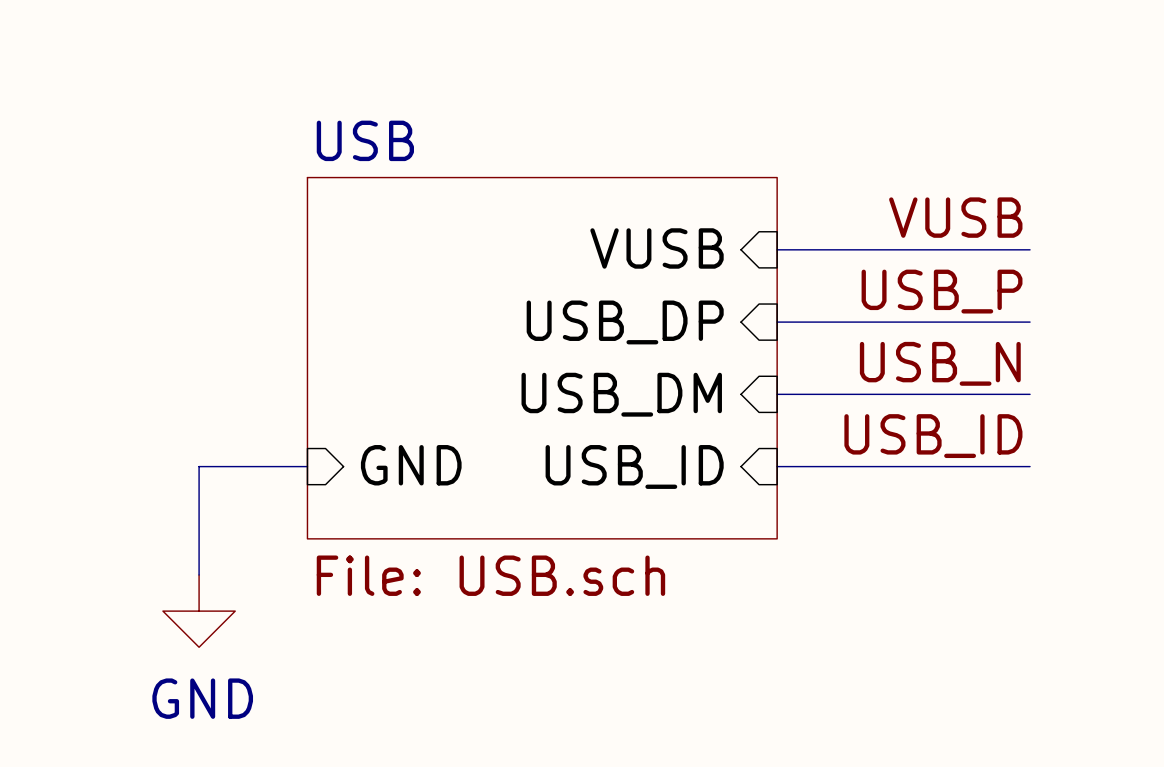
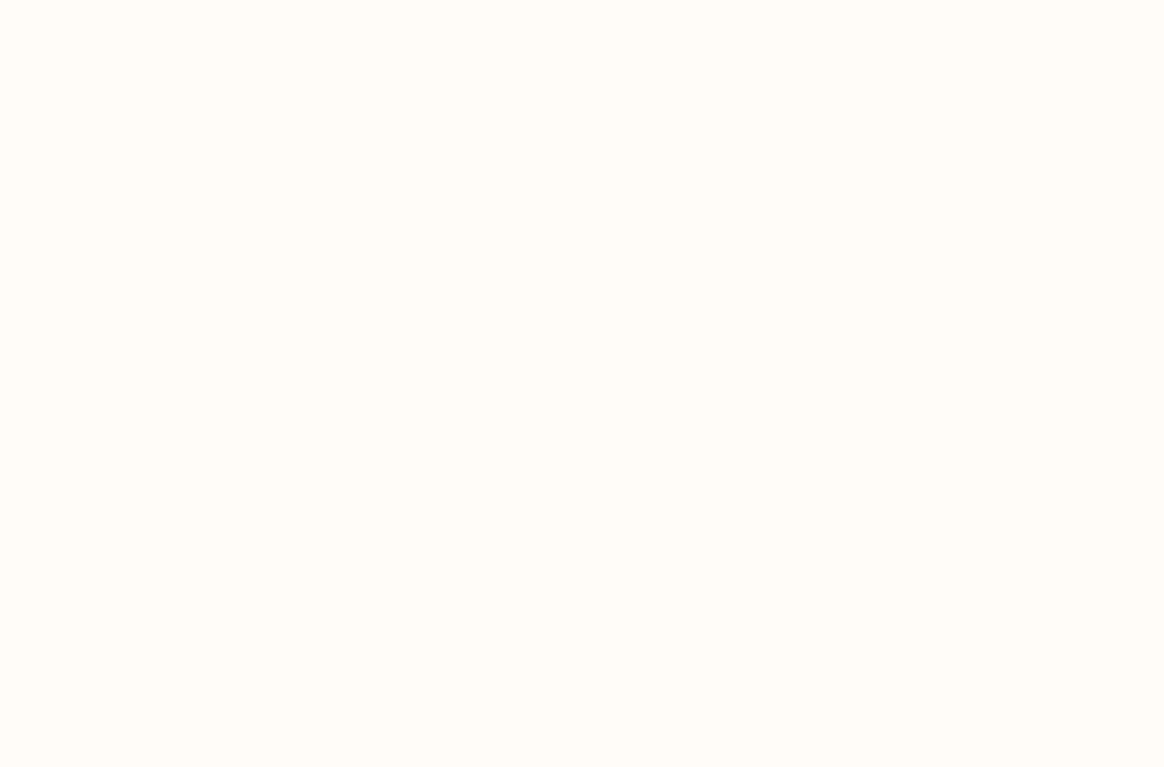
label: VUSB (955, 217) -> none
sheet pin: VUSB (657, 248) -> none
wire: (777, 249) (1030, 249) -> none
label: USB_P (942, 291) -> none
sheet pin: USB_DP (625, 322) -> none
wire: (777, 322) (1030, 322) -> none
sheet USB: File: USB.sch (542, 358) -> none
label: USB_N (940, 363) -> none
sheet pin: USB_DM (621, 394) -> none
wire: (777, 394) (1030, 394) -> none
label: USB_ID (933, 436) -> none
sheet pin: GND (411, 465) -> none
wire: (307, 466) (199, 466) (199, 574) -> none
sheet pin: USB_ID (634, 466) -> none
wire: (777, 466) (1030, 466) -> none
power symbol: GND (199, 611) -> none

